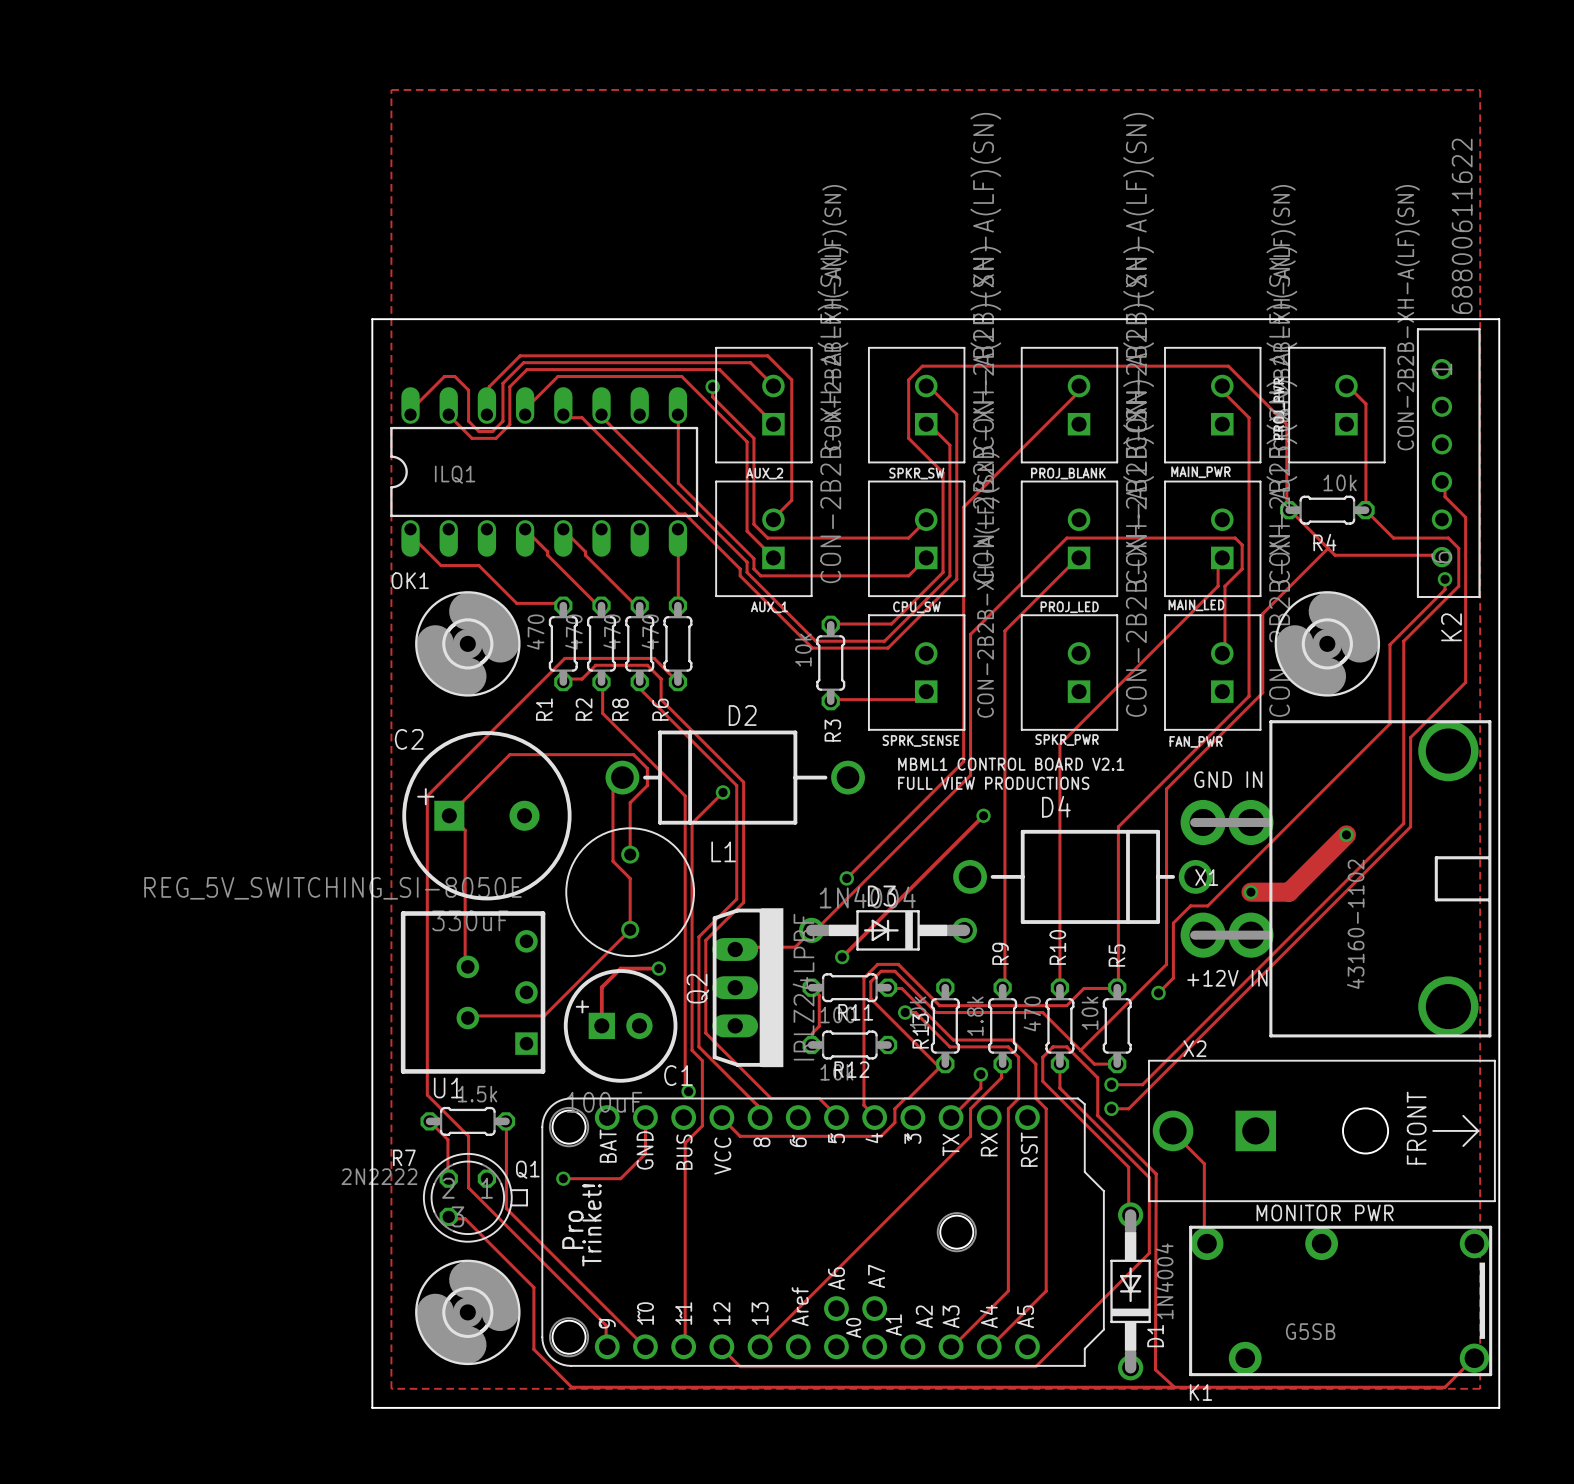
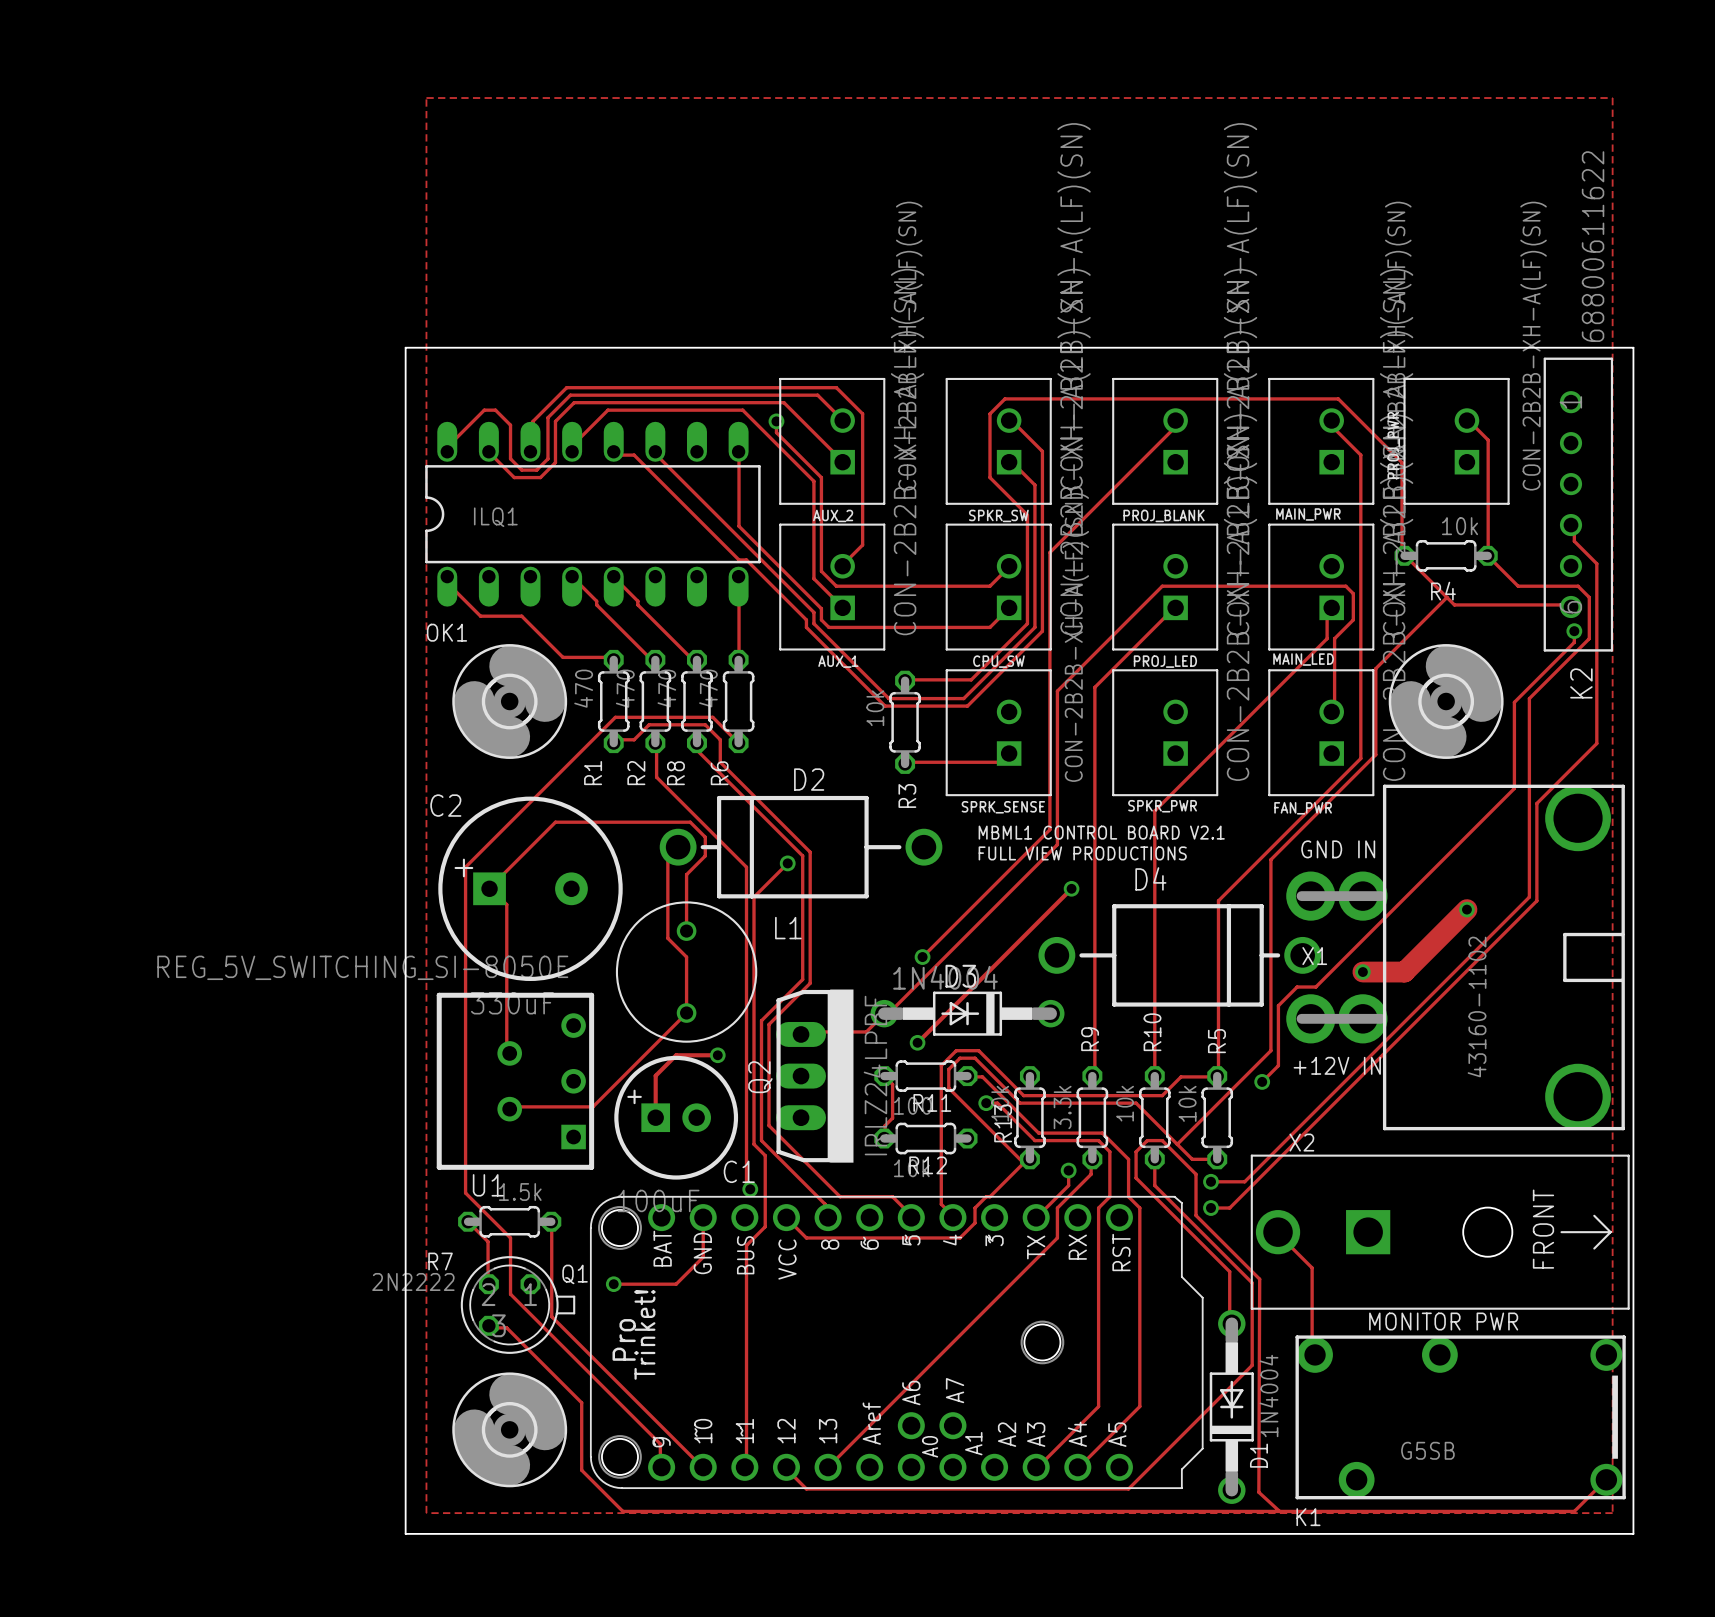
R10 value: 470 (1032, 1013) -> 10k (1125, 1103)
R9 value: 1.8k (975, 1016) -> 3.3k (1062, 1107)

